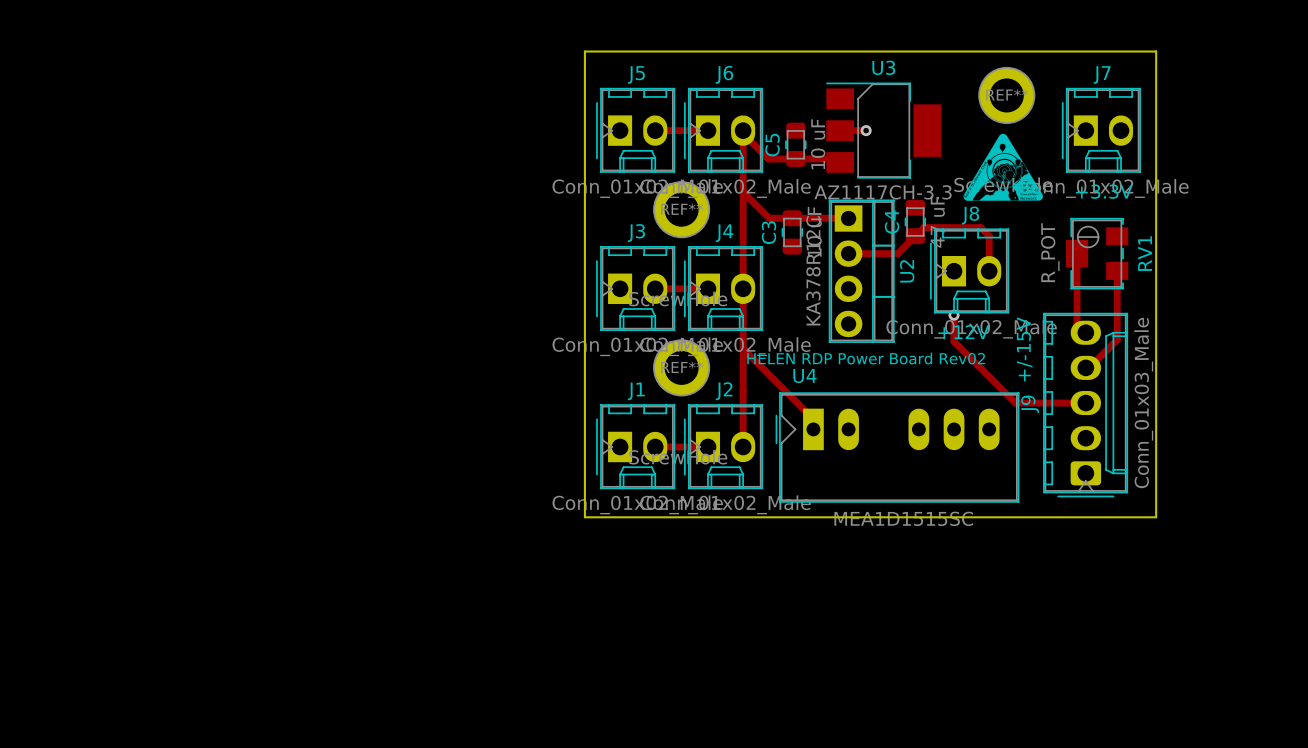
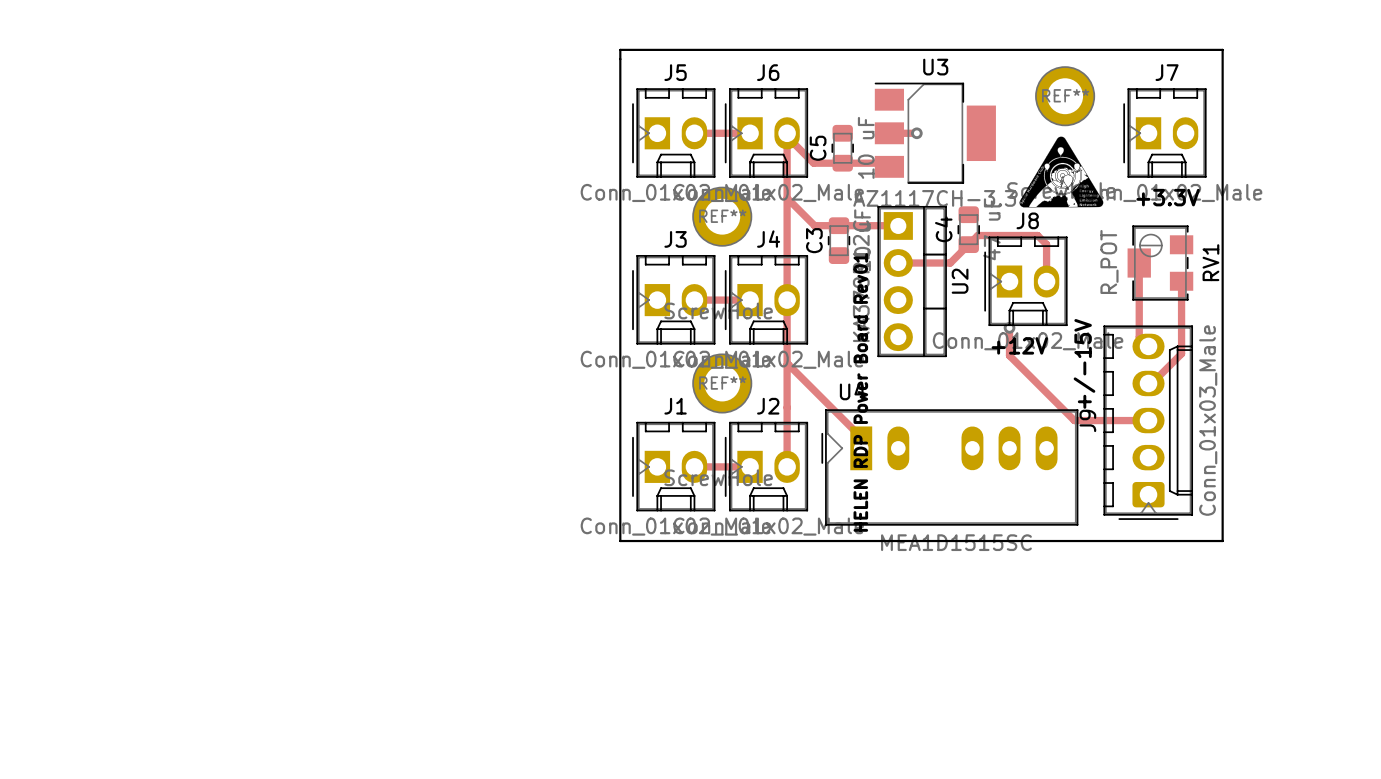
text: HELEN RDP Power Board Rev02 (866, 358) -> HELEN RDP Power Board Rev01 (860, 392)

